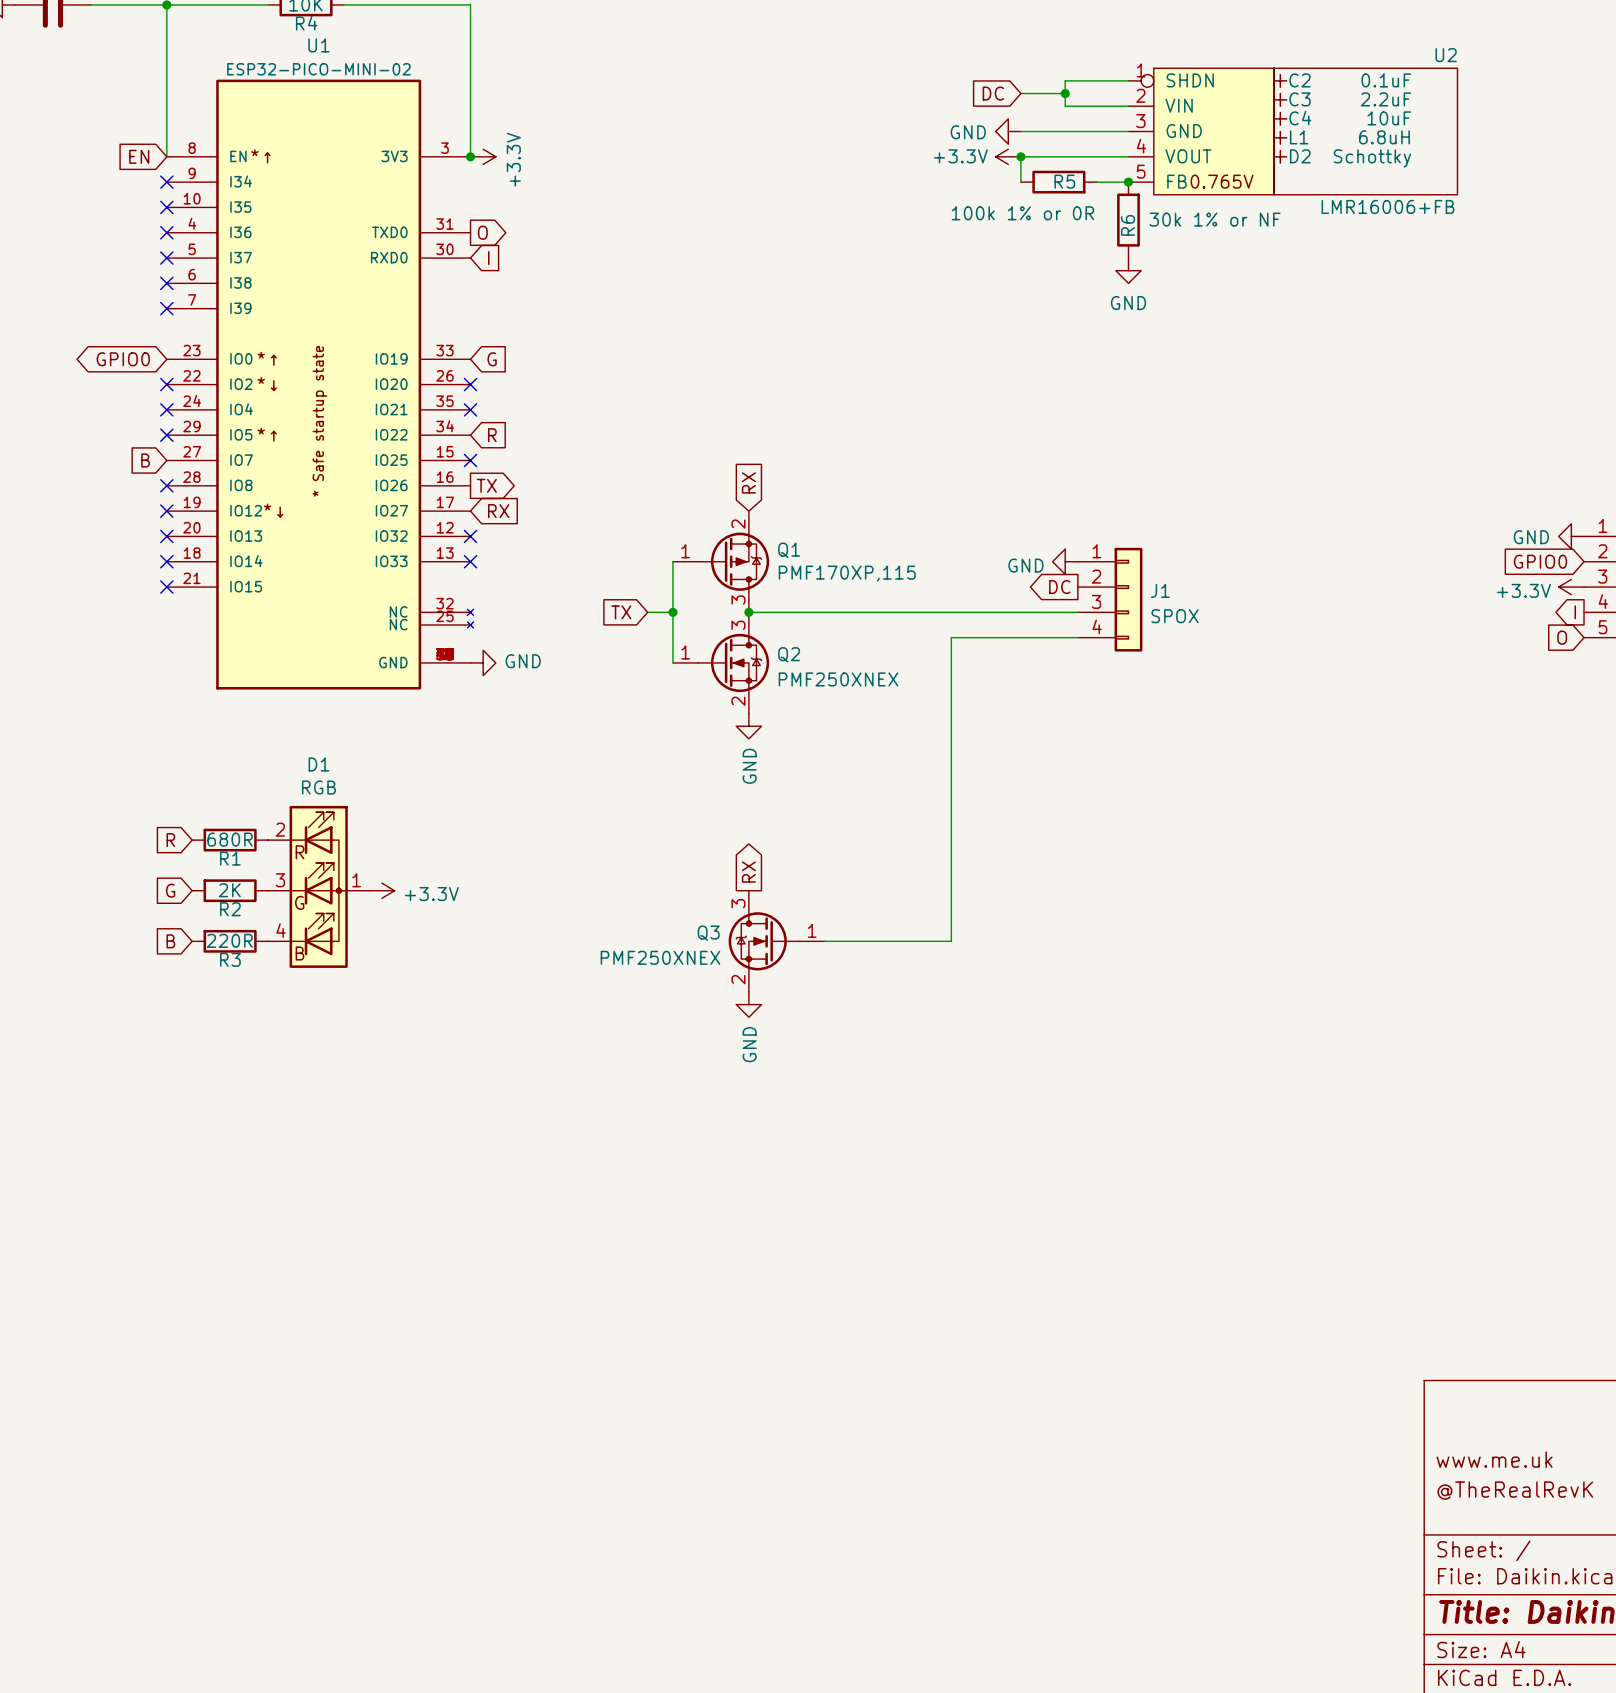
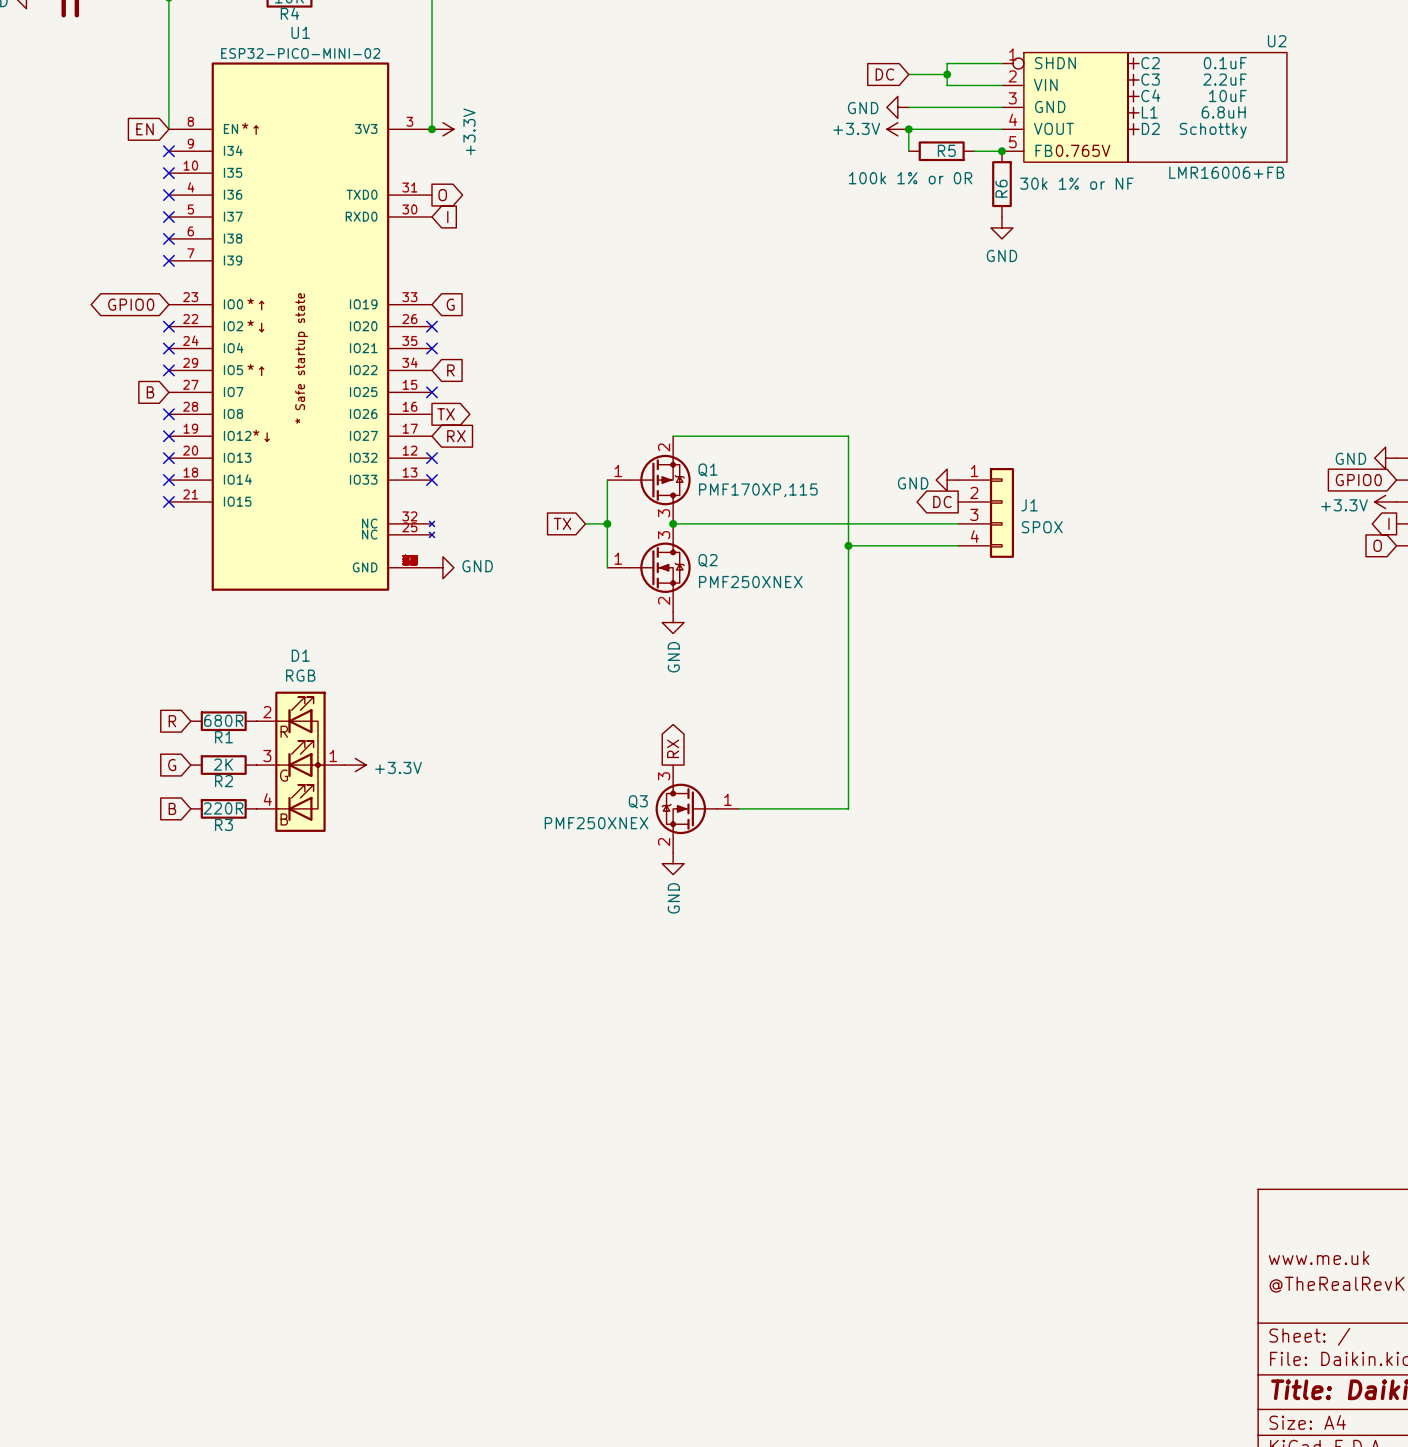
global label: RX (748, 482) -> none
wire: none -> (673, 436) (848, 436) (848, 545)
junction: none -> (848, 545)

